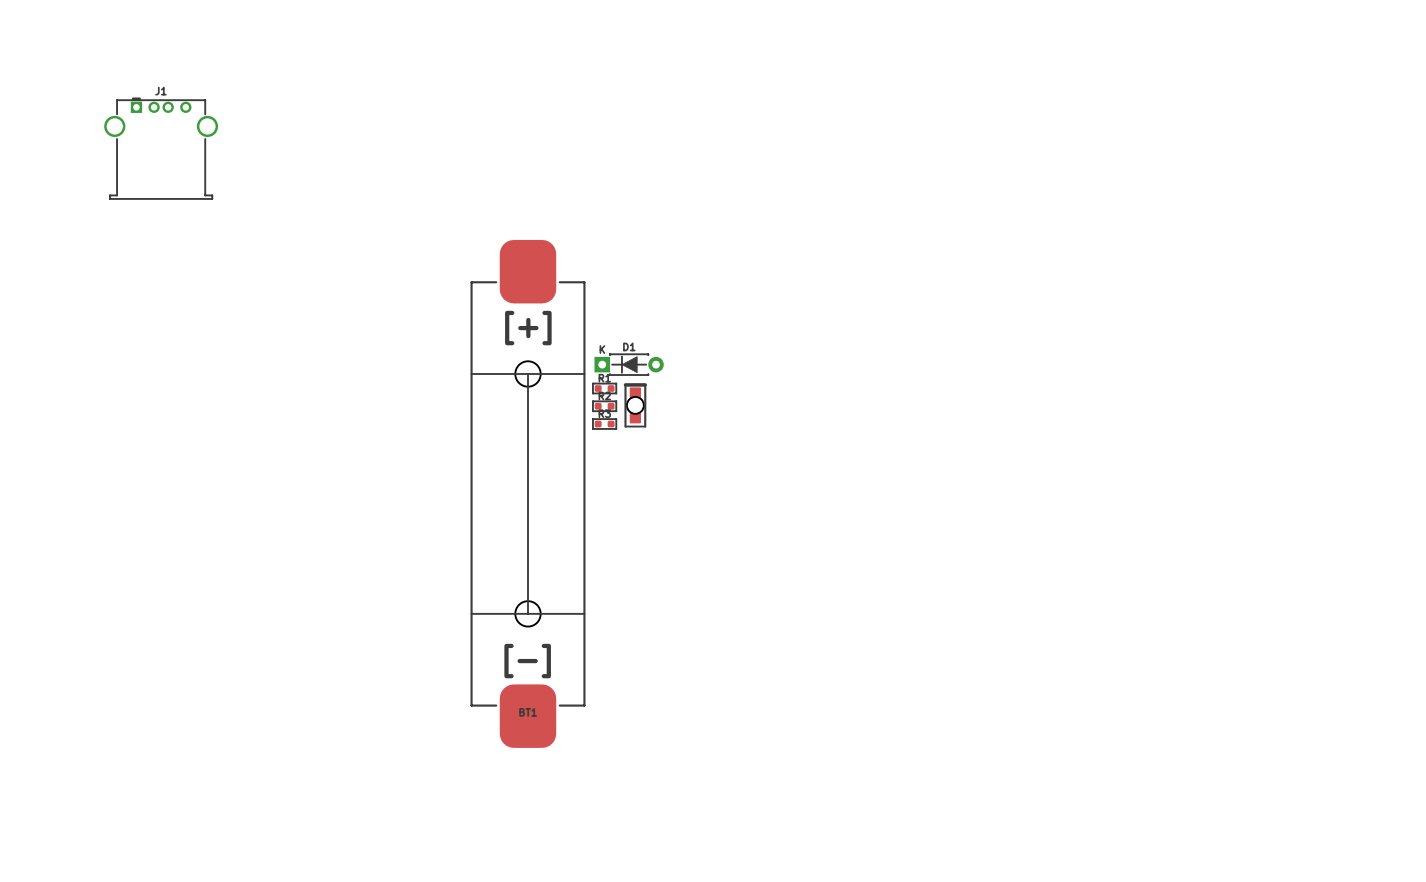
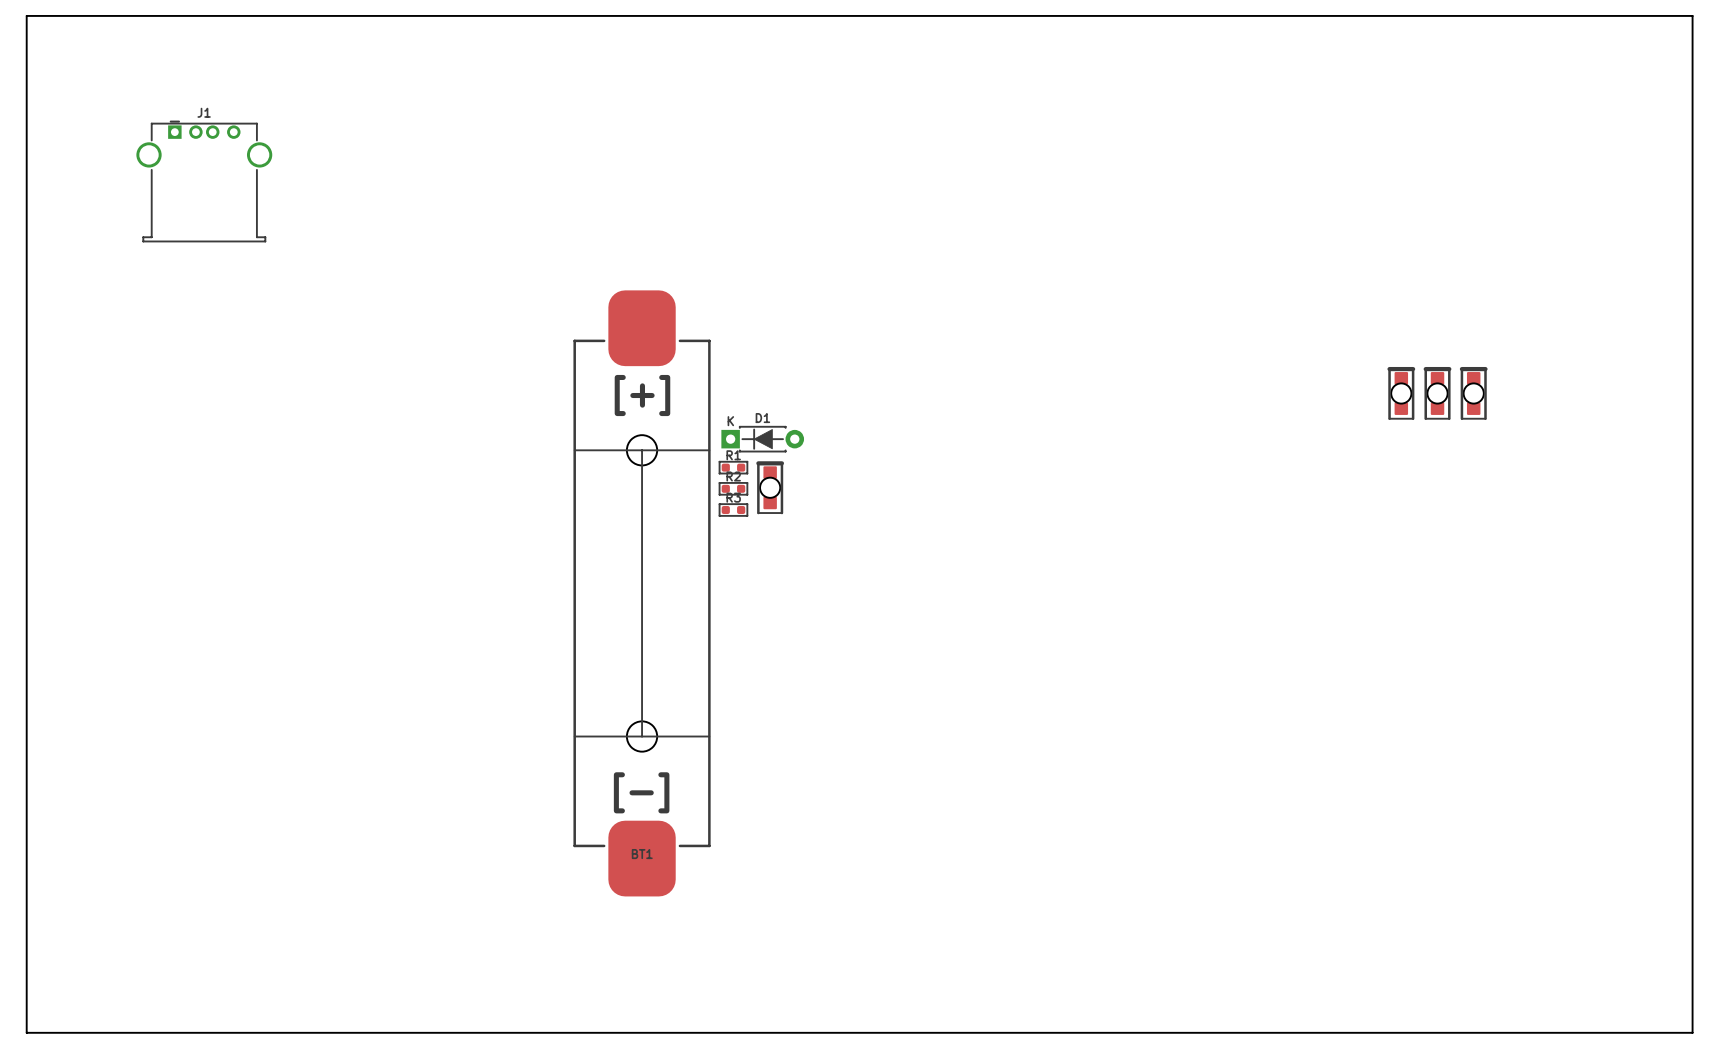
board edge: none -> (26, 15) (1692, 15) (1692, 1032) (26, 1032) (26, 15)
part: none -> (1401, 393)
part: none -> (1437, 393)
part: none -> (1473, 393)

